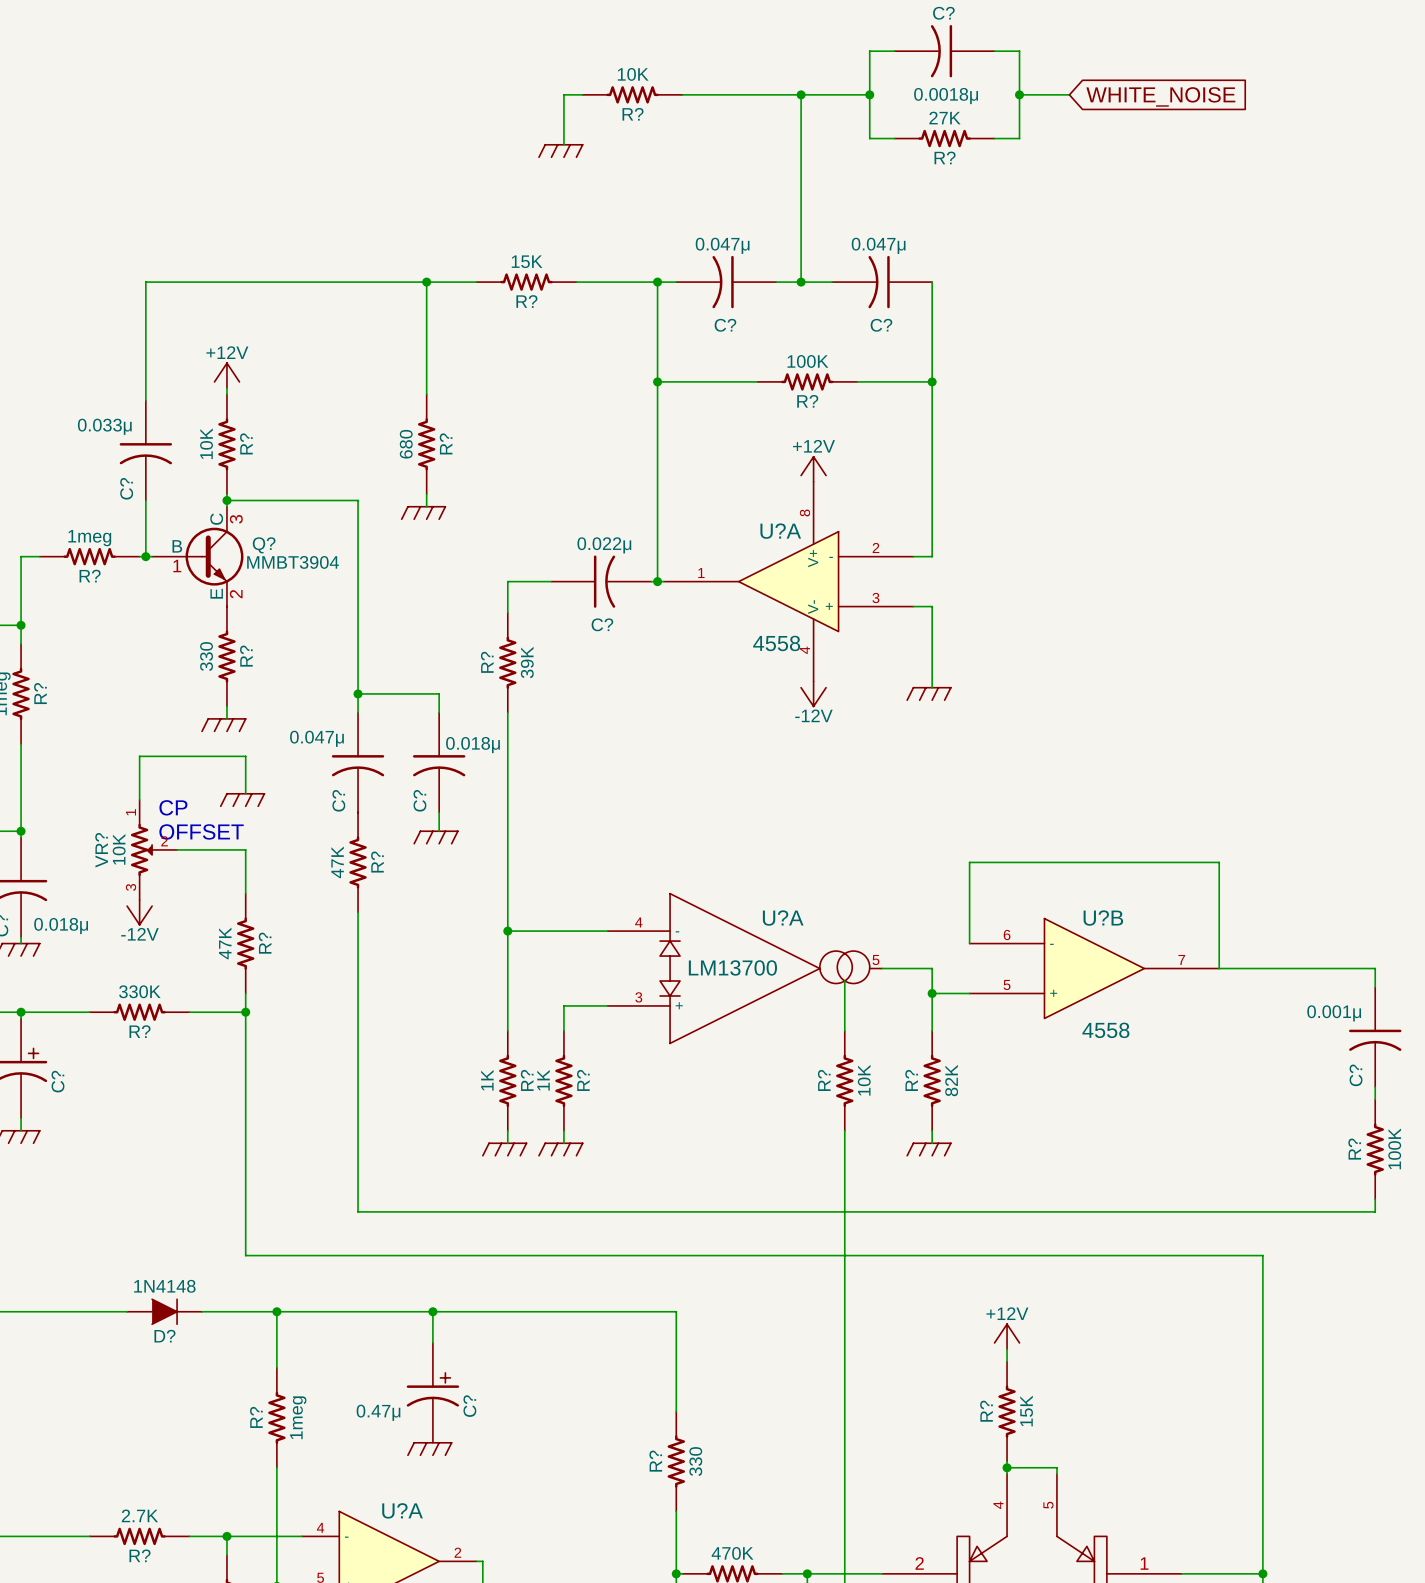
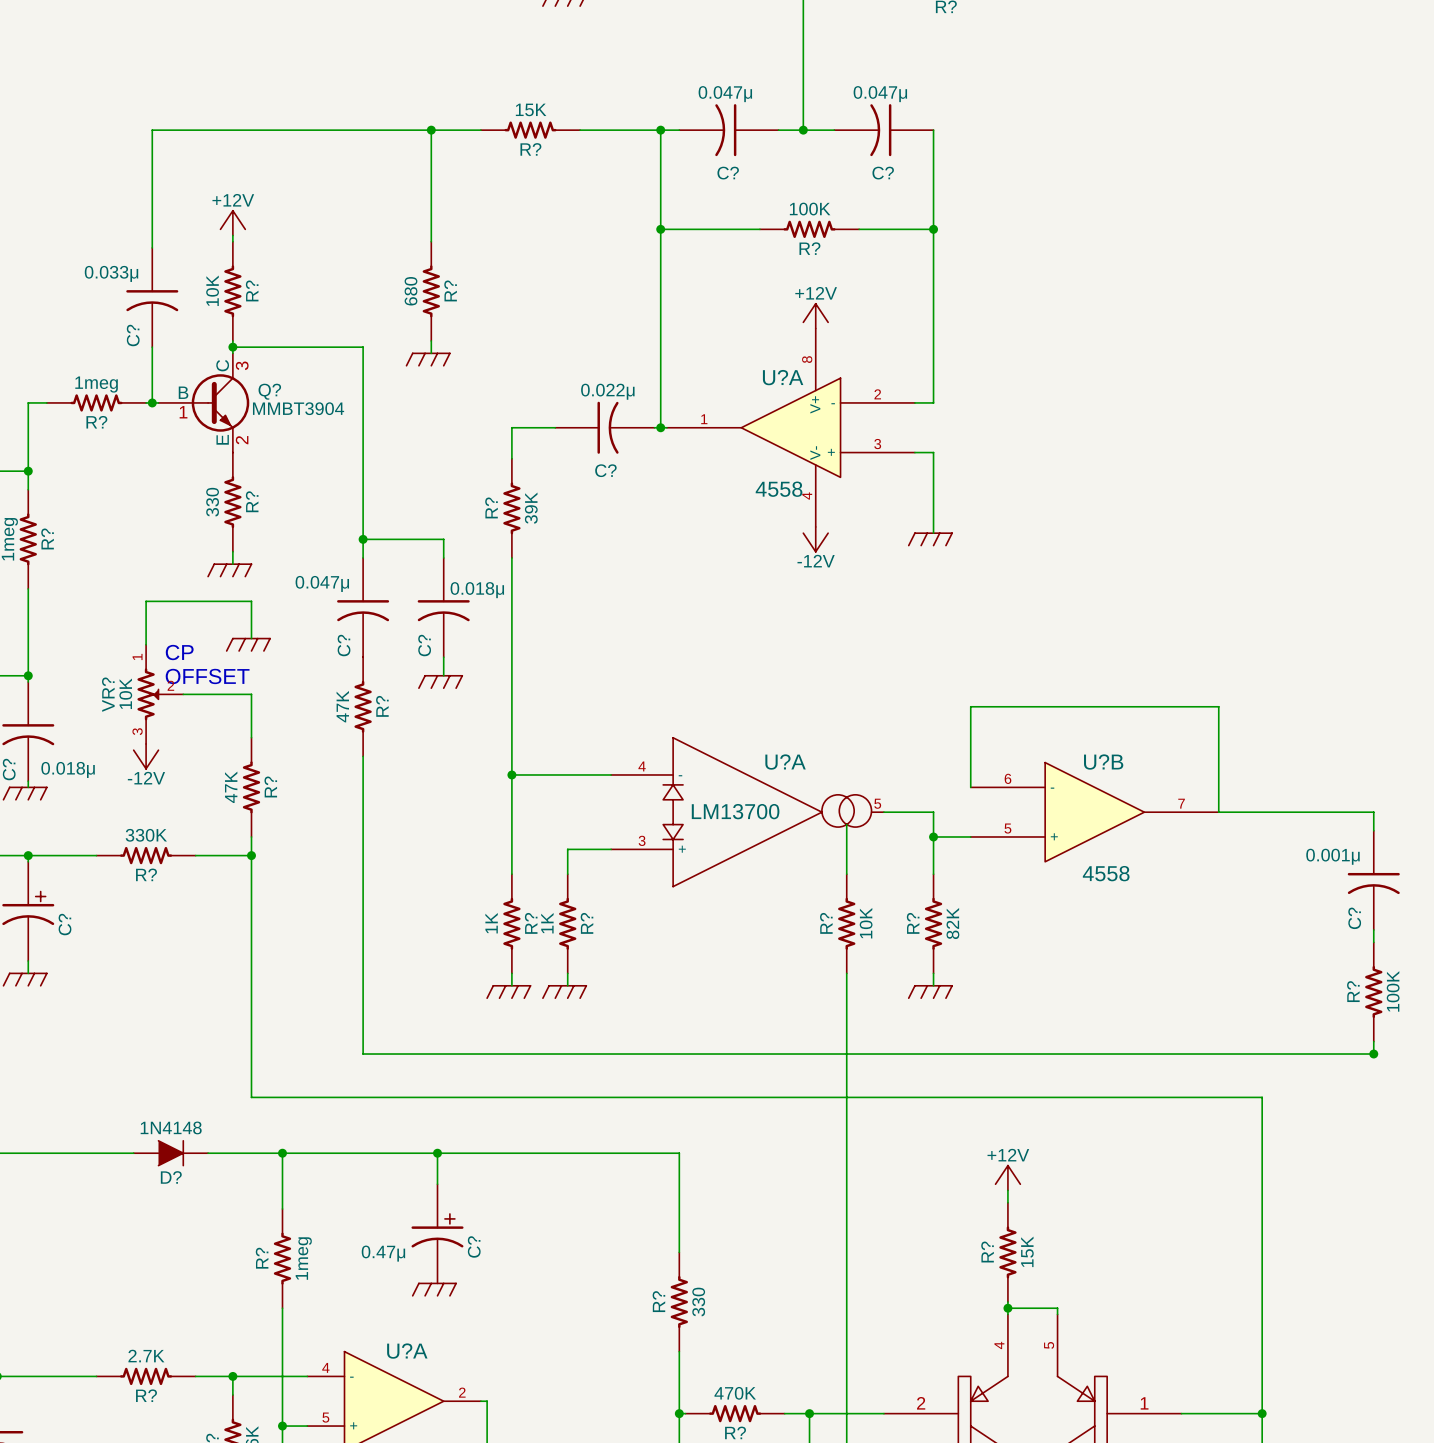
junction: none -> (1373, 1054)

